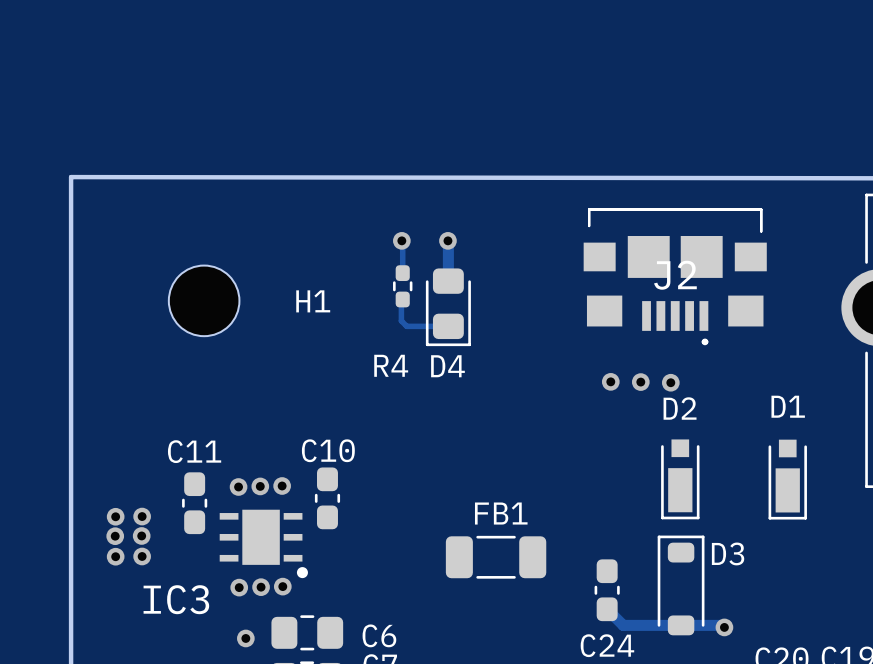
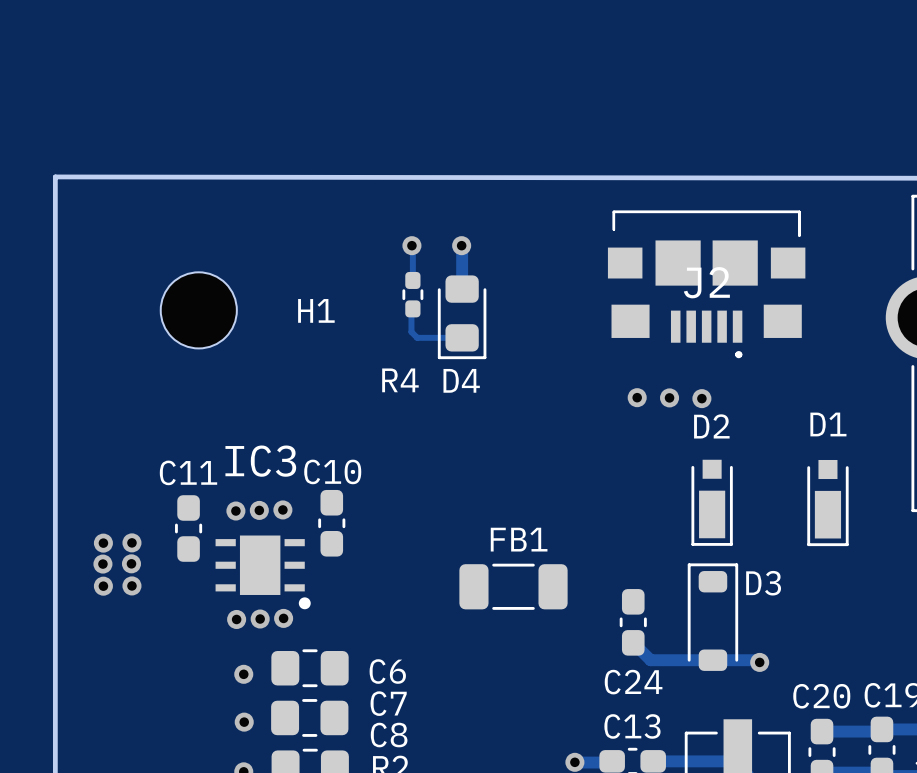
IC3 name position: IC3 (176, 599) -> IC3 (260, 461)

